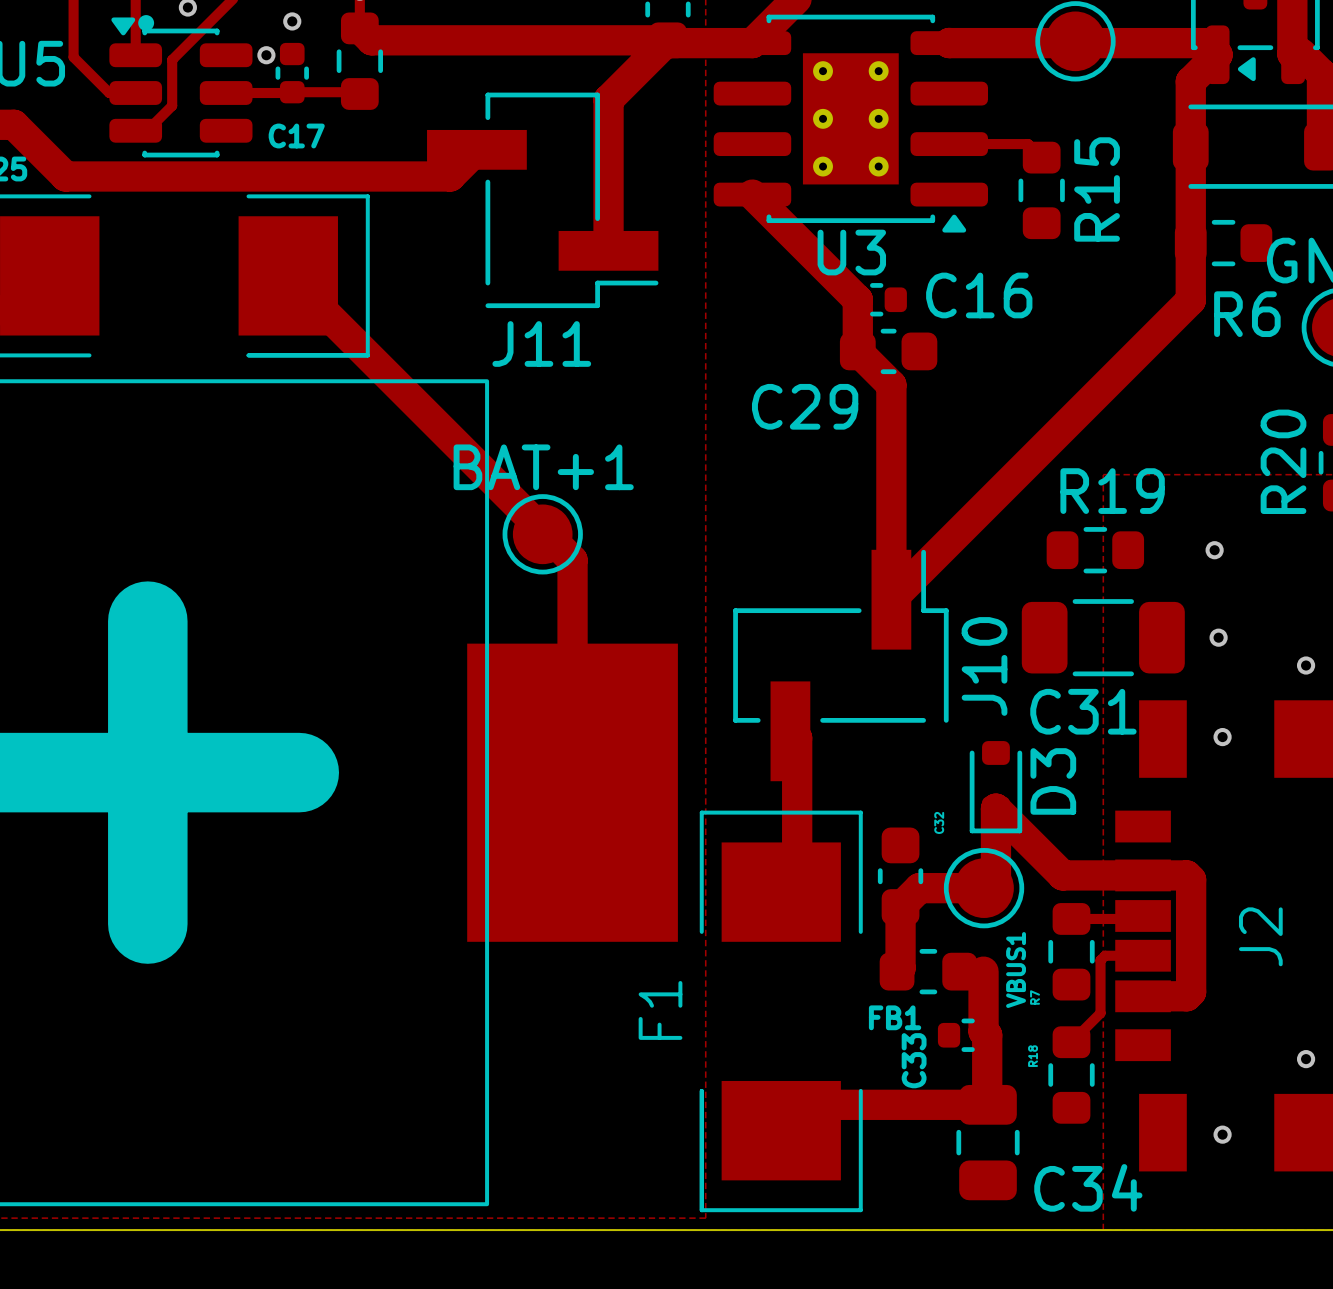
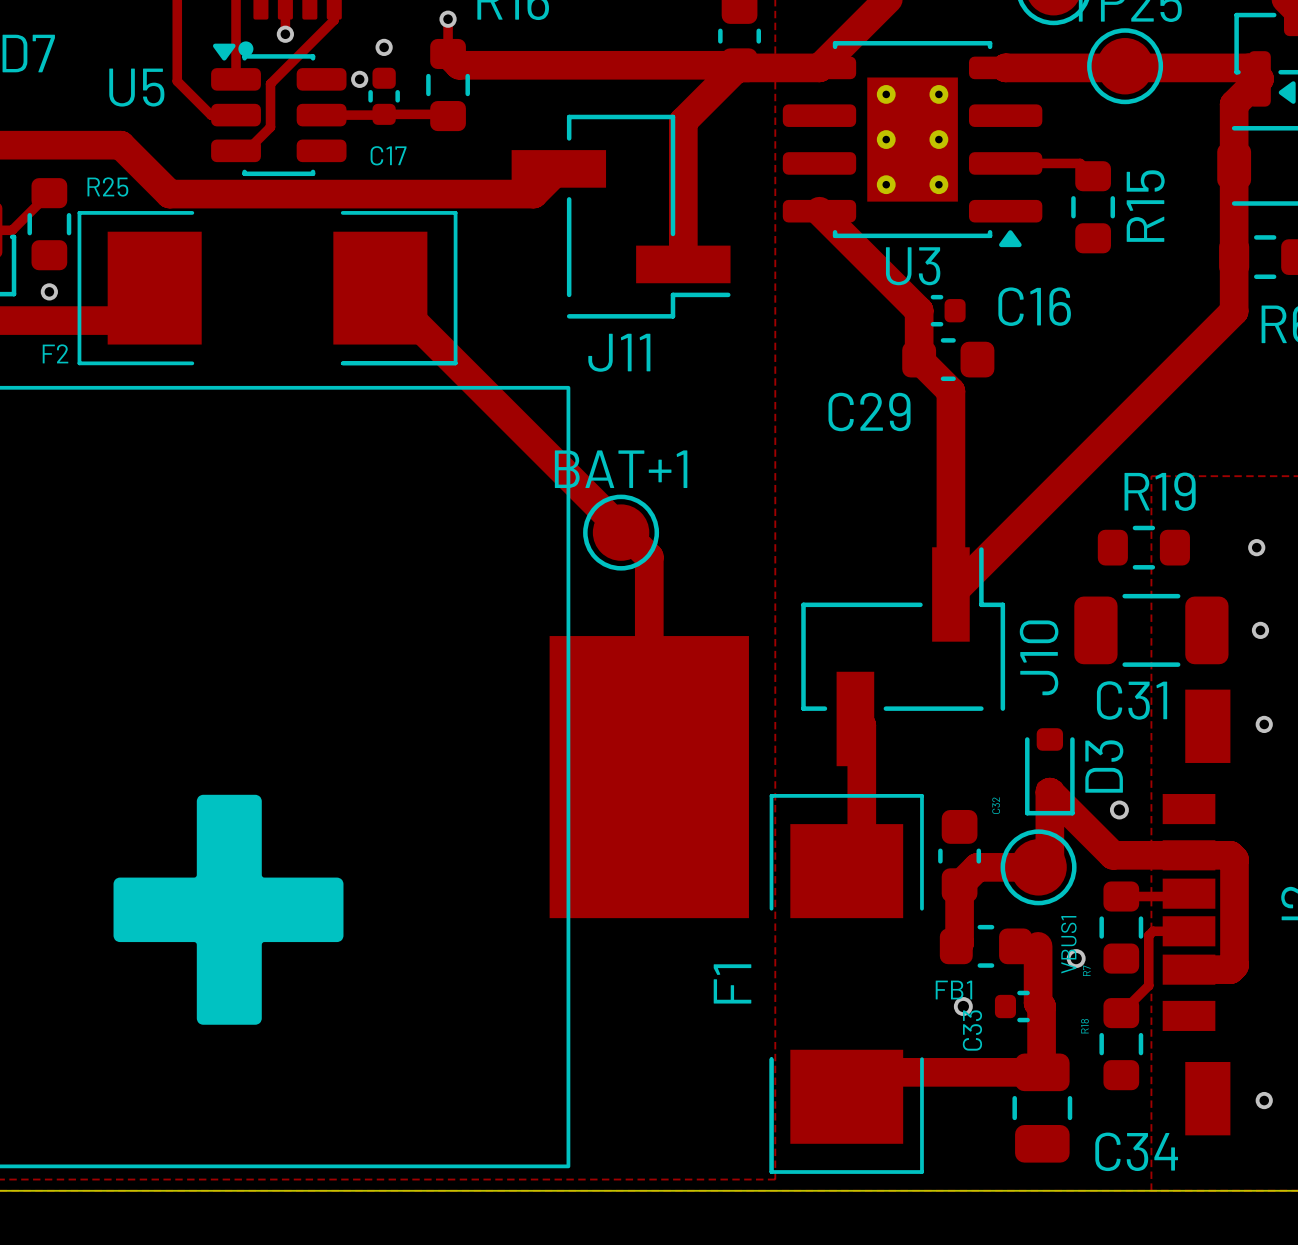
via: none -> (1119, 809)
via: none -> (1076, 958)
via: none -> (963, 1006)

